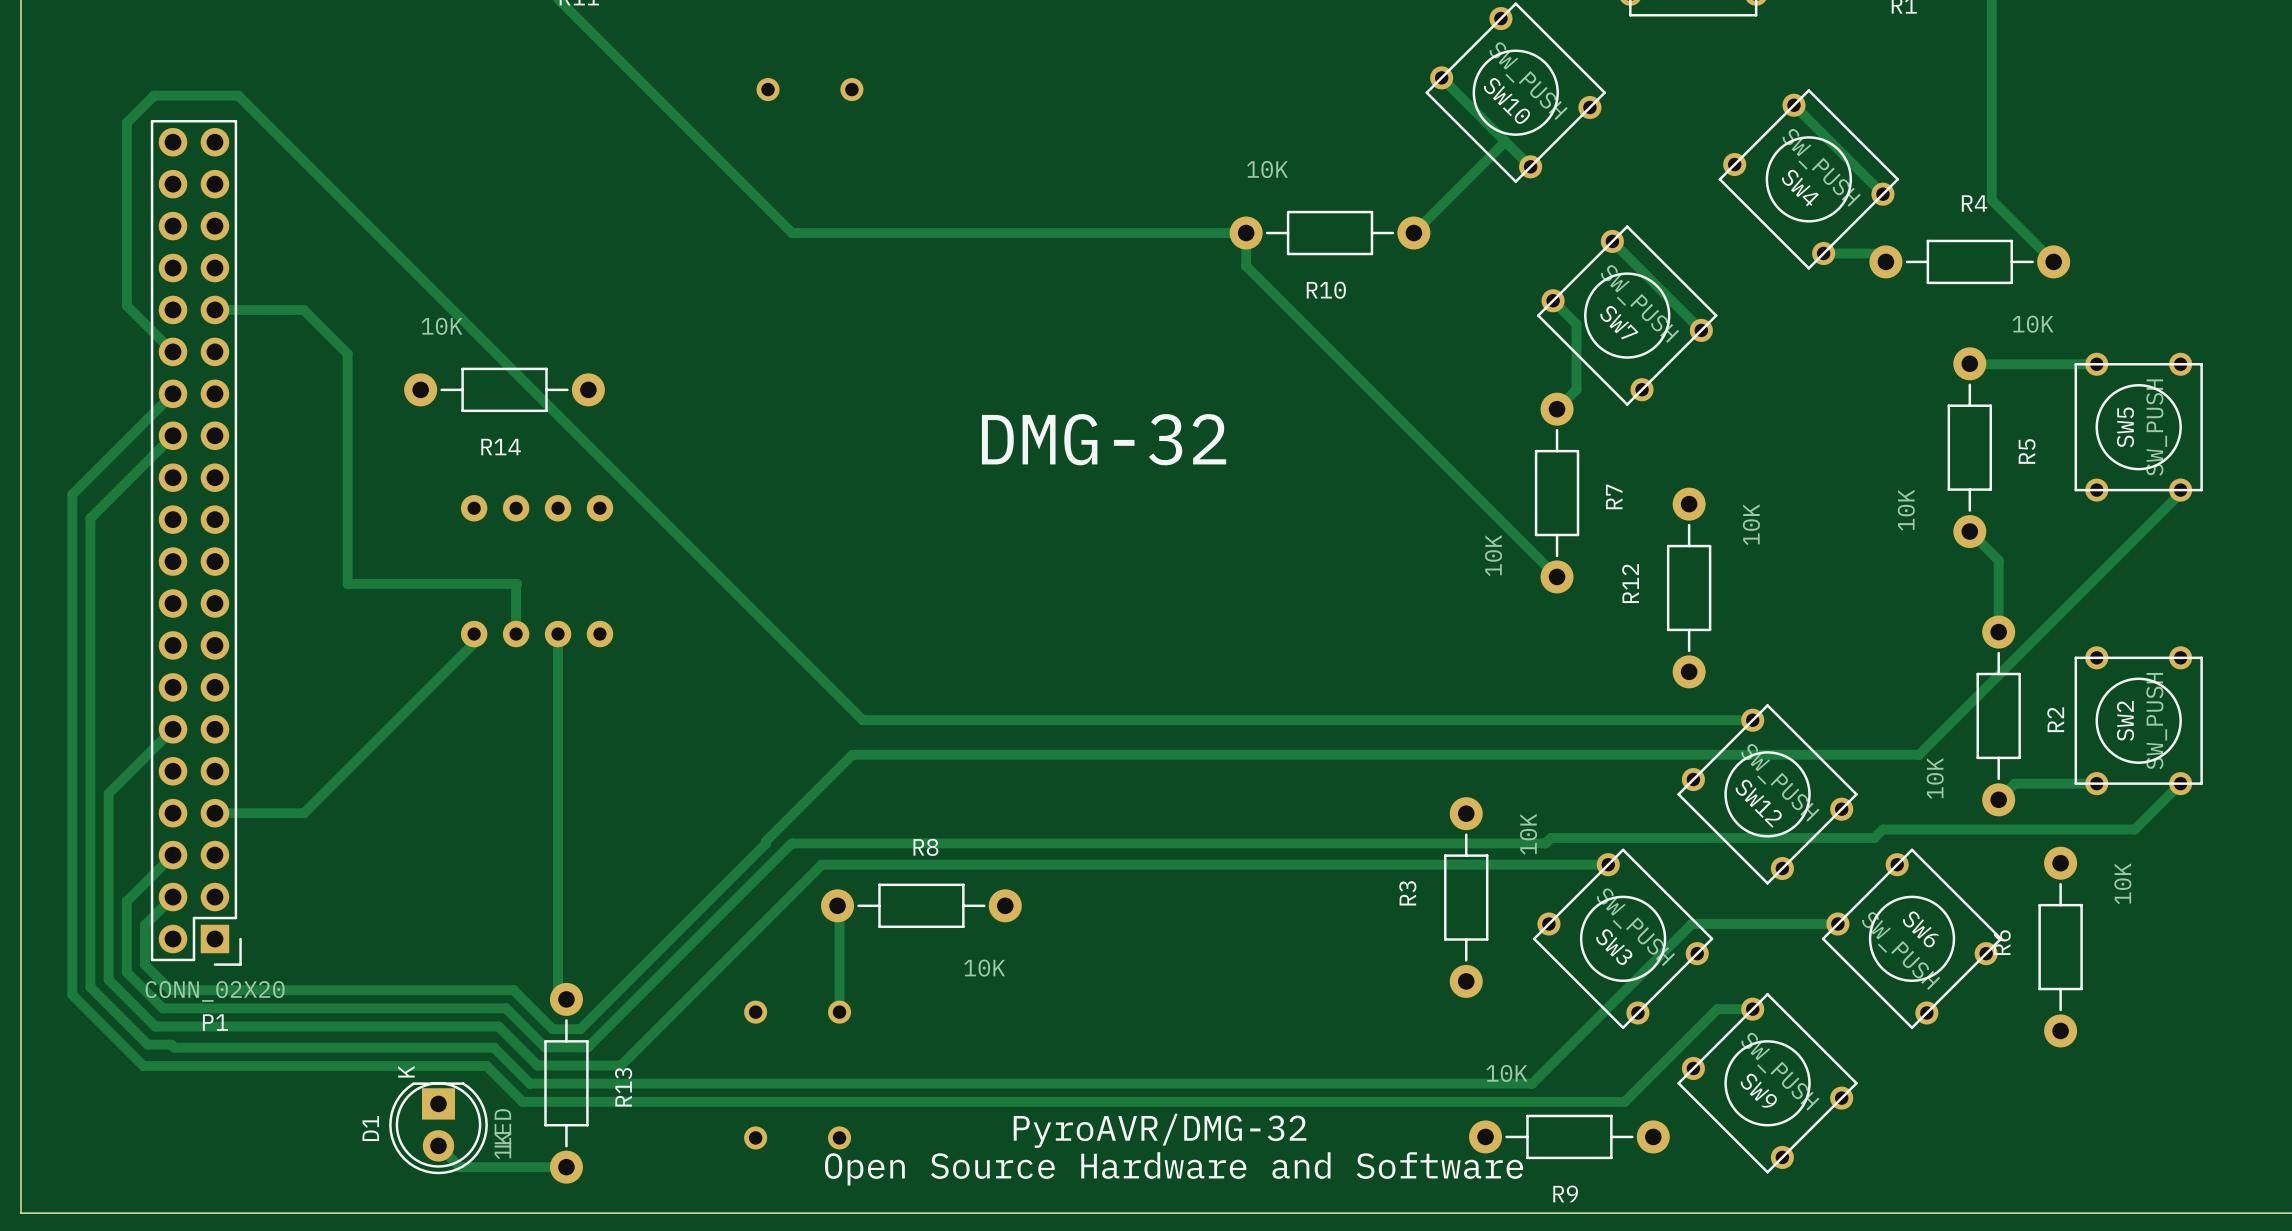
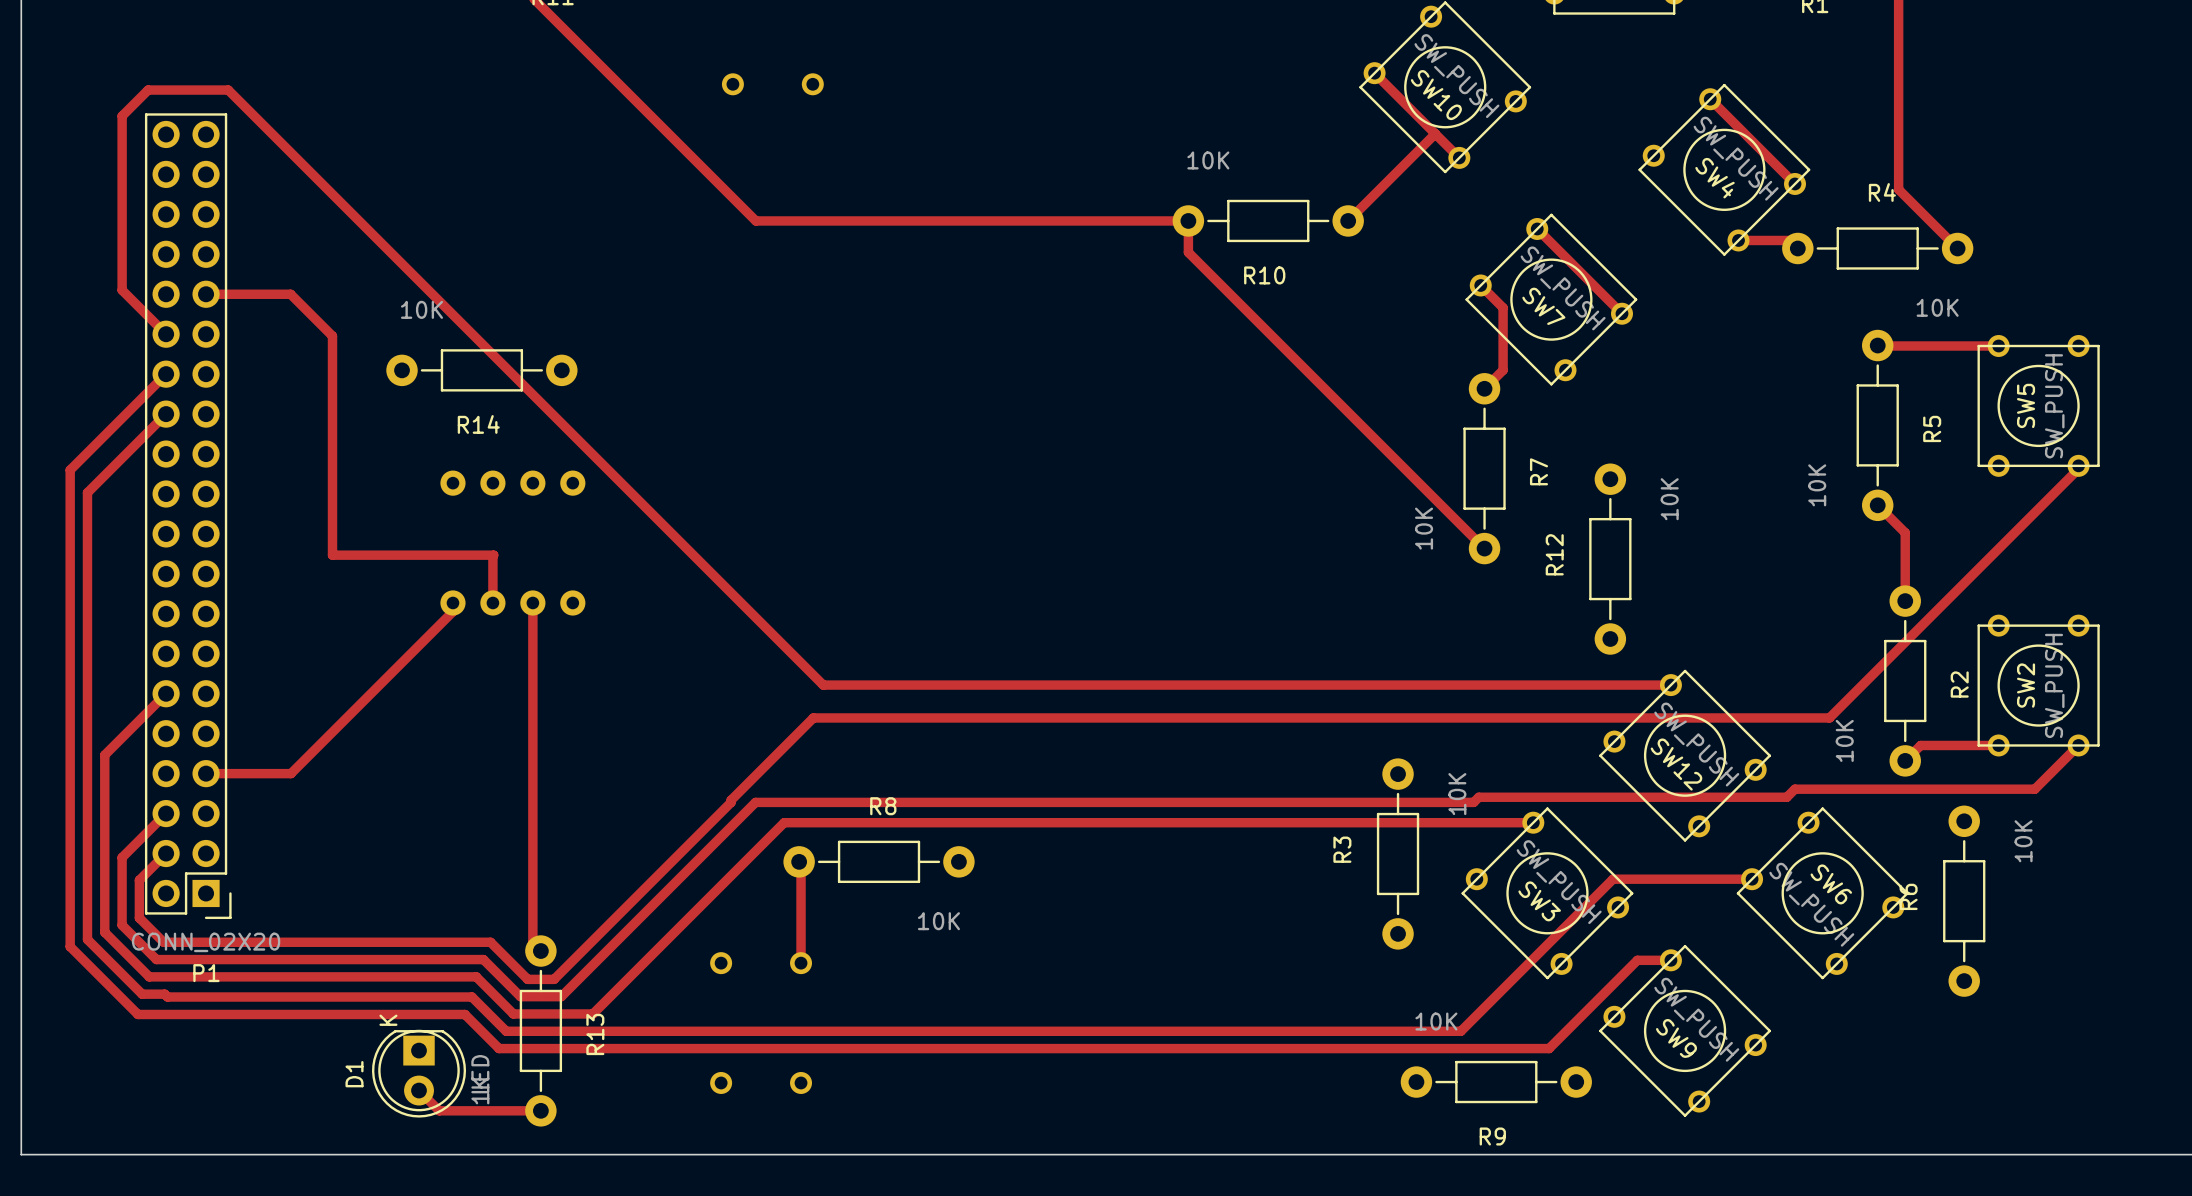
text: DMG-32 (1104, 439) -> none
text: PyroAVR/DMG-32 (1160, 1130) -> none
text: Open Source Hardware and Software (1174, 1168) -> none

